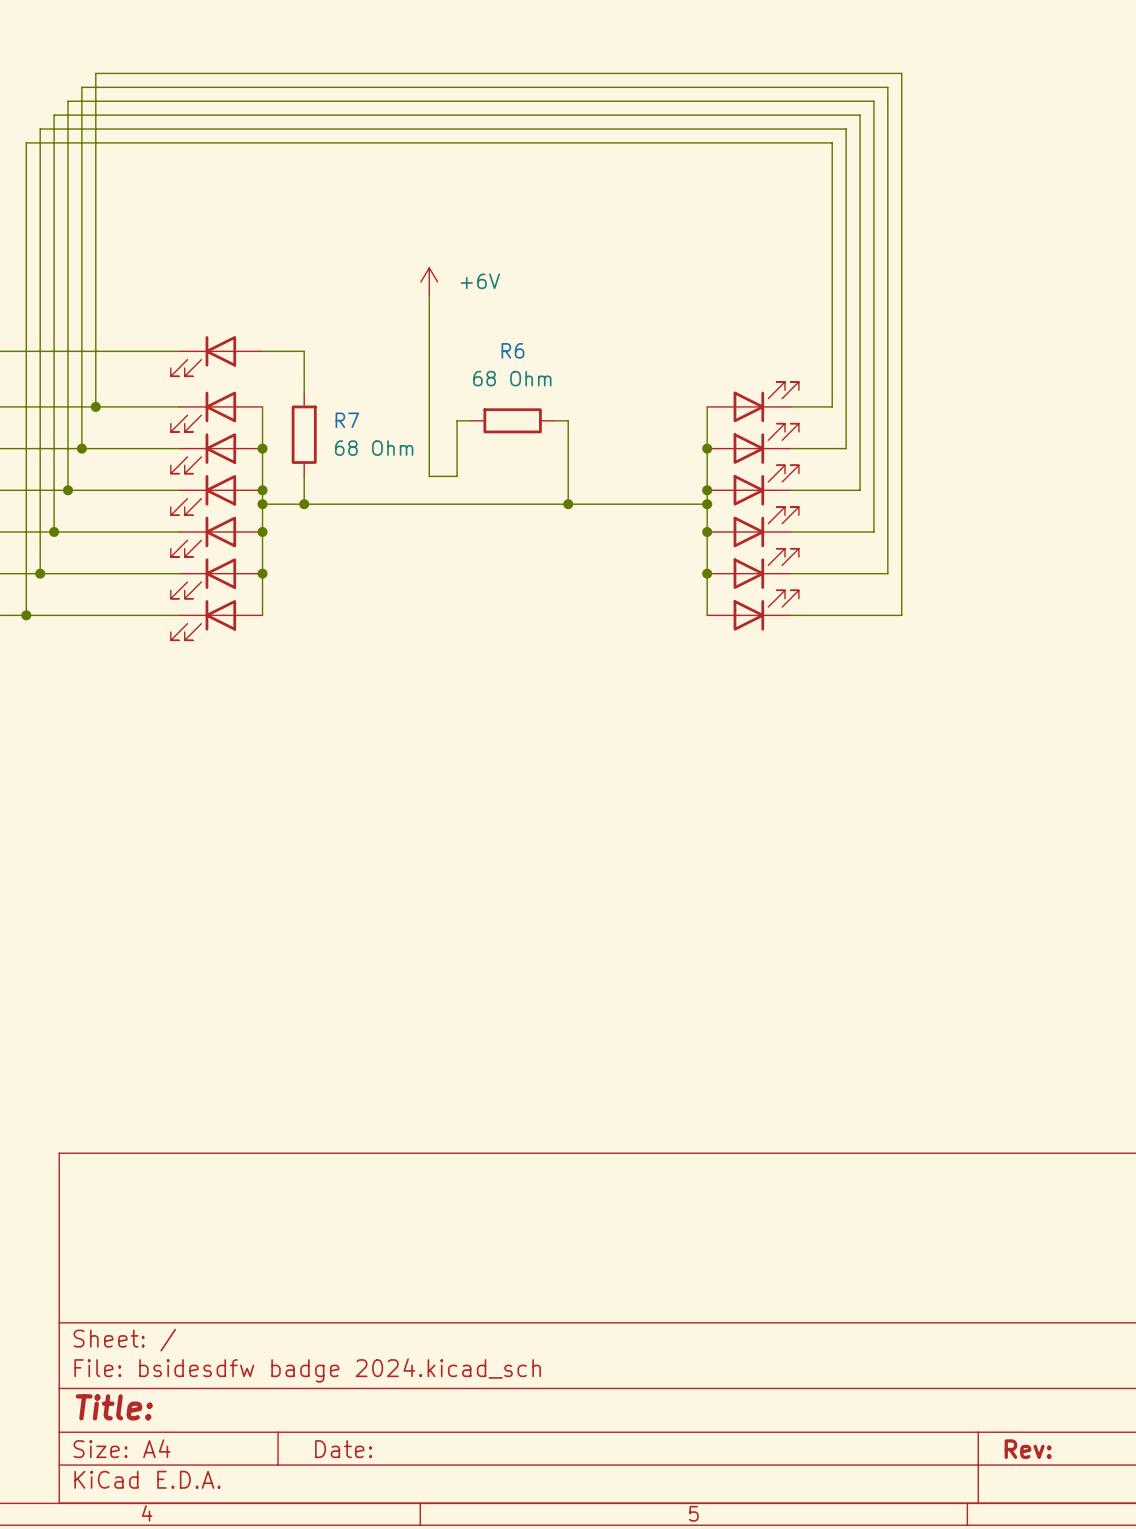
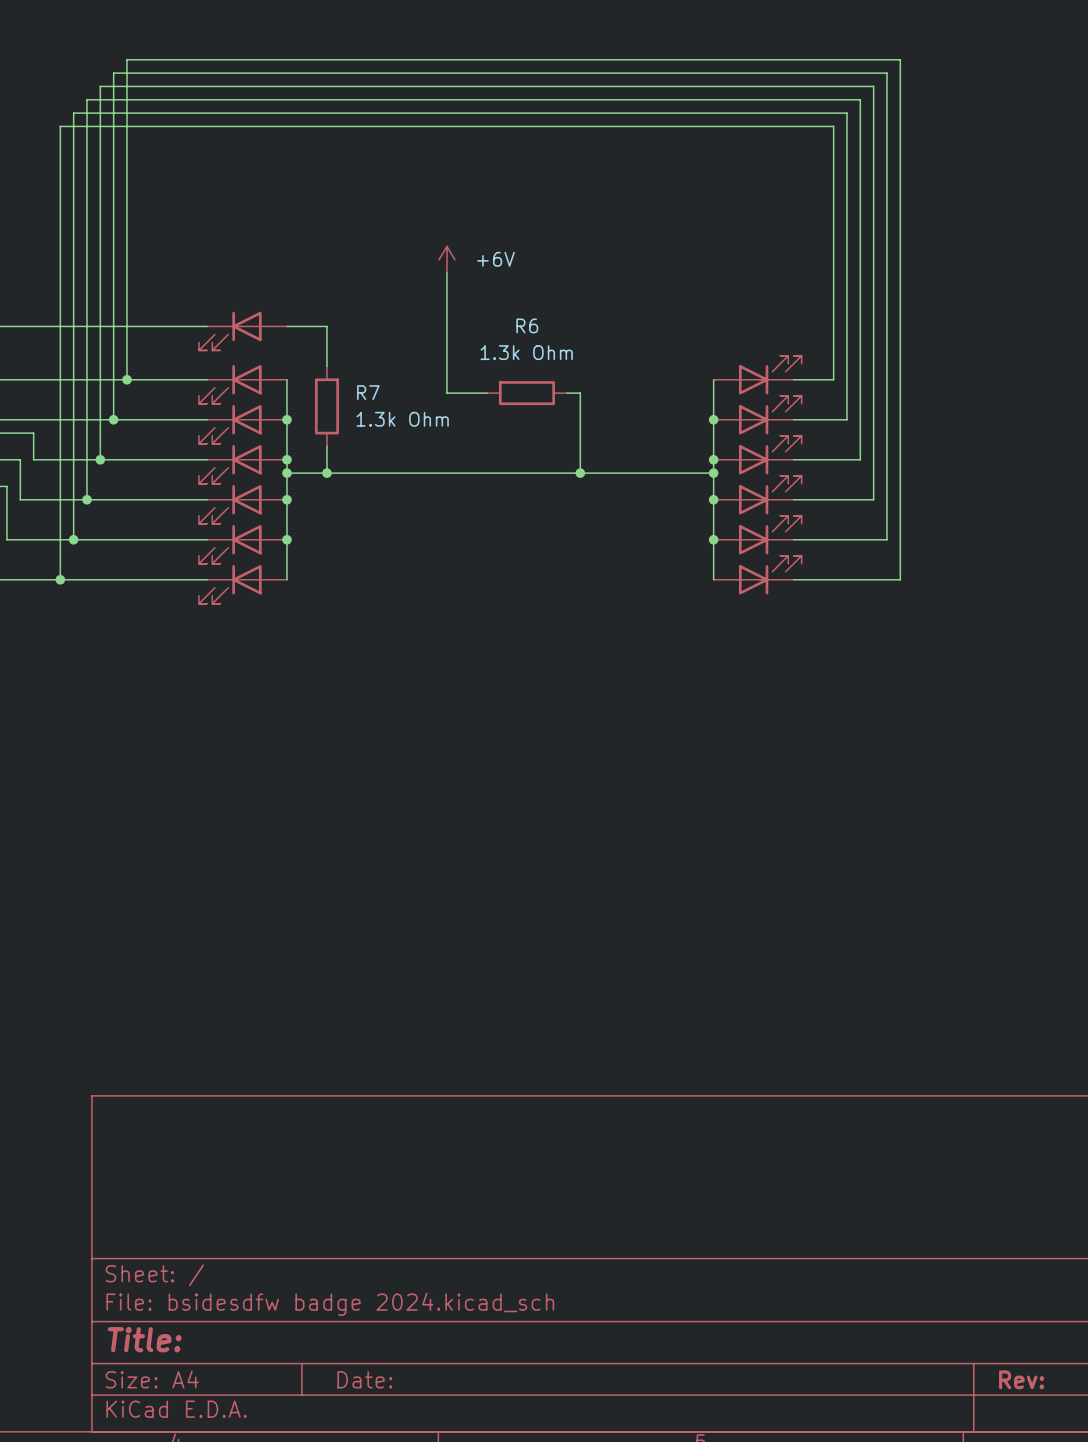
R6 value: 68 Ohm (512, 378) -> 1.3k Ohm (526, 352)
wire: (429, 420) (429, 476) (457, 476) (457, 420) -> (446, 393) (473, 393)
R7 value: 68 Ohm (374, 448) -> 1.3k Ohm (402, 419)

